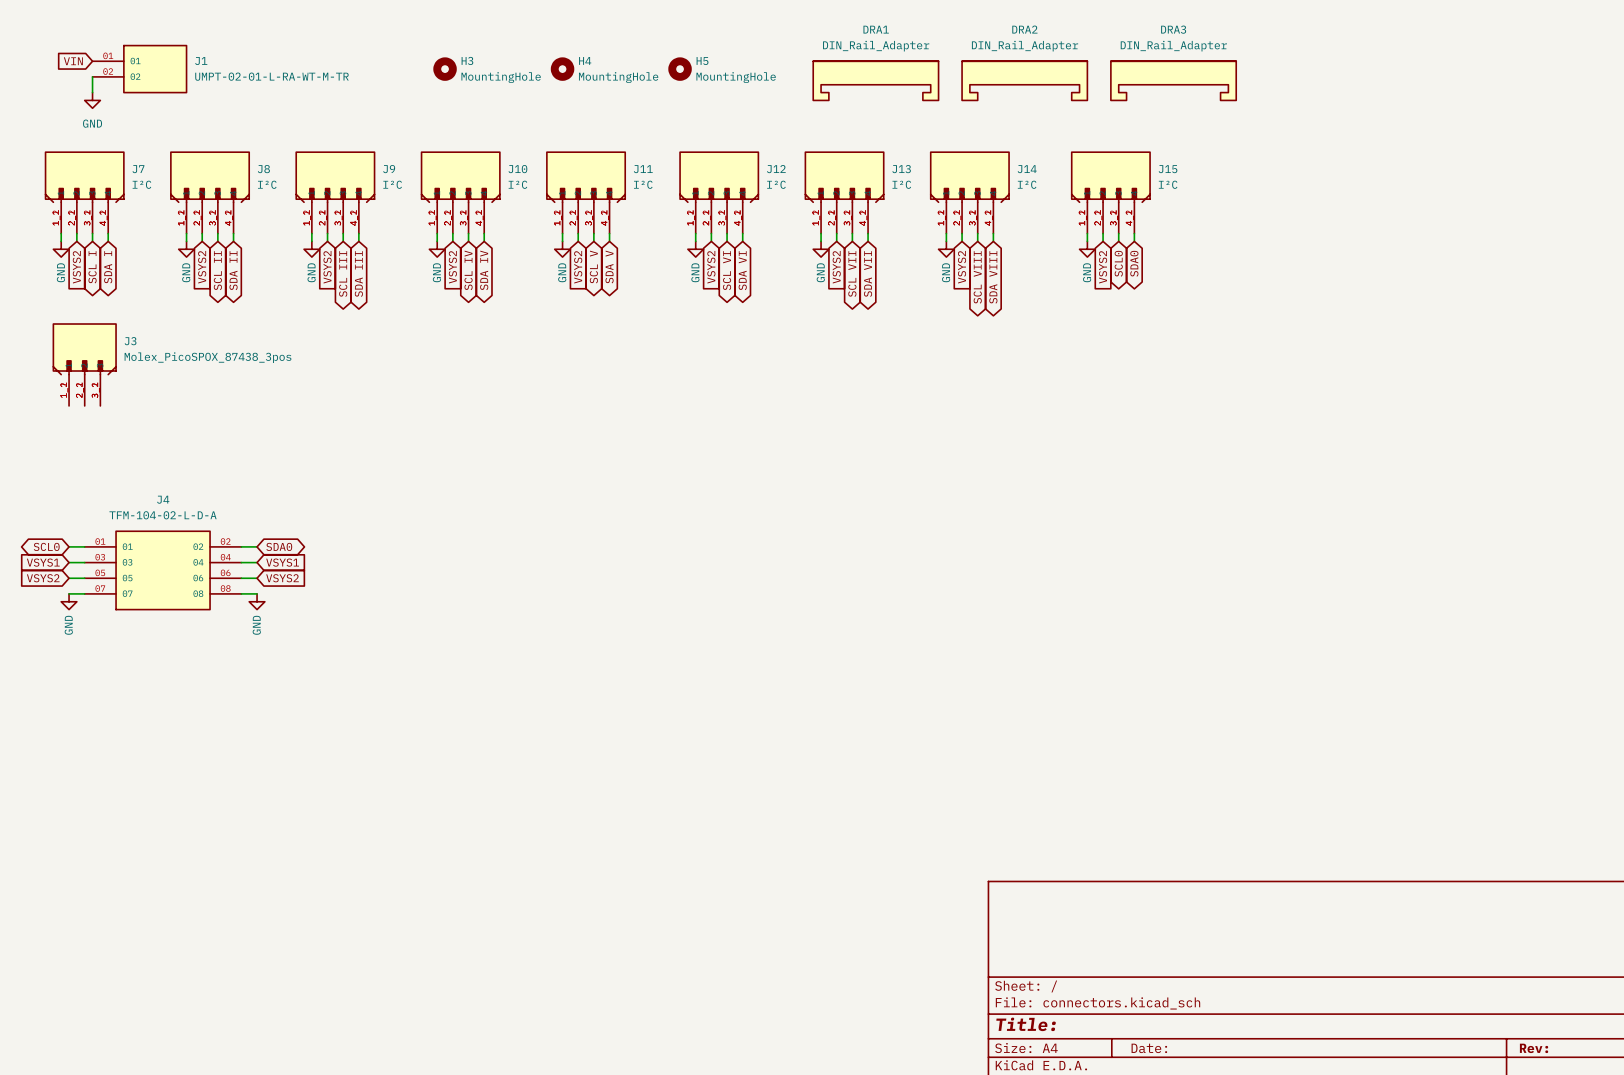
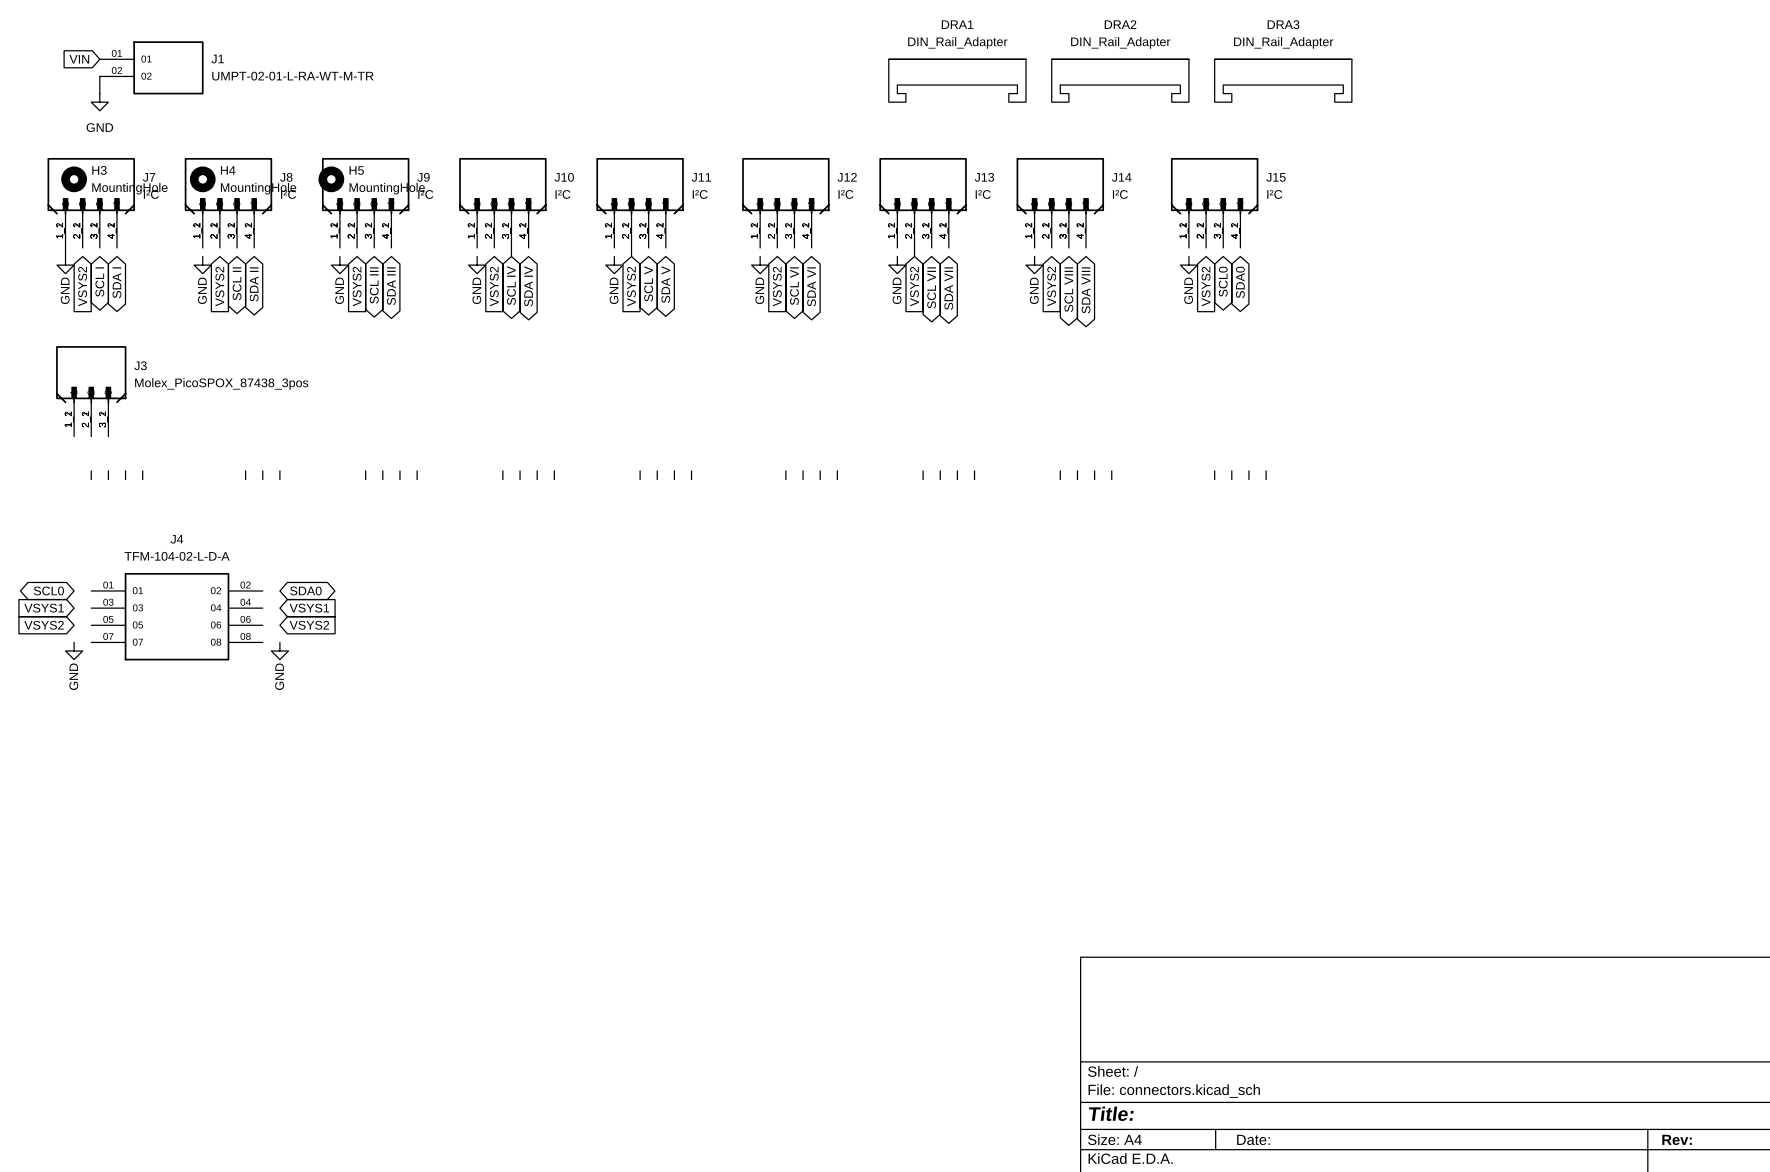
H3 position: (445, 69) -> (74, 179)
H4 position: (562, 69) -> (202, 179)
H5 position: (680, 69) -> (331, 179)
wire: (76, 233) (76, 241) -> none
wire: (92, 233) (92, 241) -> none
wire: (108, 233) (108, 241) -> none
wire: (186, 233) (186, 241) -> none
wire: (202, 233) (202, 241) -> none
wire: (217, 233) (217, 241) -> none
wire: (233, 233) (233, 241) -> none
wire: (311, 233) (311, 241) -> none
wire: (327, 233) (327, 241) -> none
wire: (343, 233) (343, 241) -> none
wire: (358, 233) (358, 241) -> none
wire: (437, 233) (437, 241) -> none
wire: (452, 233) (452, 241) -> none
wire: (484, 233) (484, 241) -> none
wire: (562, 233) (562, 241) -> none
wire: (593, 233) (593, 241) -> none
wire: (609, 233) (609, 241) -> none
wire: (695, 233) (695, 241) -> none
wire: (711, 233) (711, 241) -> none
wire: (727, 233) (727, 241) -> none
wire: (742, 233) (742, 241) -> none
wire: (821, 233) (821, 241) -> none
wire: (852, 233) (852, 241) -> none
wire: (868, 233) (868, 241) -> none
wire: (946, 233) (946, 241) -> none
wire: (962, 233) (962, 241) -> none
wire: (977, 233) (977, 241) -> none
wire: (993, 233) (993, 241) -> none
wire: (1087, 233) (1087, 241) -> none
wire: (1103, 233) (1103, 241) -> none
wire: (1118, 233) (1118, 241) -> none
wire: (1134, 233) (1134, 241) -> none
wire: none -> (91, 470) (91, 479)
wire: none -> (108, 470) (108, 479)
wire: none -> (125, 470) (125, 479)
wire: none -> (142, 470) (142, 479)
wire: none -> (245, 470) (245, 479)
wire: none -> (262, 470) (262, 479)
wire: none -> (279, 470) (279, 479)
wire: none -> (365, 470) (365, 479)
wire: none -> (382, 470) (382, 479)
wire: none -> (399, 470) (399, 479)
wire: none -> (417, 470) (417, 479)
wire: none -> (502, 470) (502, 479)
wire: none -> (520, 470) (520, 479)
wire: none -> (537, 470) (537, 479)
wire: none -> (554, 470) (554, 479)
wire: none -> (640, 470) (640, 479)
wire: none -> (657, 470) (657, 479)
wire: none -> (674, 470) (674, 479)
wire: none -> (691, 470) (691, 479)
wire: none -> (785, 470) (785, 479)
wire: none -> (803, 470) (803, 479)
wire: none -> (820, 470) (820, 479)
wire: none -> (837, 470) (837, 479)
wire: none -> (923, 470) (923, 479)
wire: none -> (940, 470) (940, 479)
wire: none -> (957, 470) (957, 479)
wire: none -> (974, 470) (974, 479)
wire: none -> (1060, 470) (1060, 479)
wire: none -> (1077, 470) (1077, 479)
wire: none -> (1094, 470) (1094, 479)
wire: none -> (1111, 470) (1111, 479)
wire: none -> (1214, 470) (1214, 479)
wire: none -> (1231, 470) (1231, 479)
wire: none -> (1248, 470) (1248, 479)
wire: none -> (1266, 470) (1266, 479)
wire: (69, 546) (84, 546) -> none
wire: (241, 546) (257, 546) -> none
wire: (69, 562) (84, 562) -> none
wire: (241, 562) (257, 562) -> none
wire: (69, 578) (84, 578) -> none
wire: (241, 578) (257, 578) -> none
wire: (69, 593) (84, 593) -> none
wire: (241, 593) (257, 593) -> none

